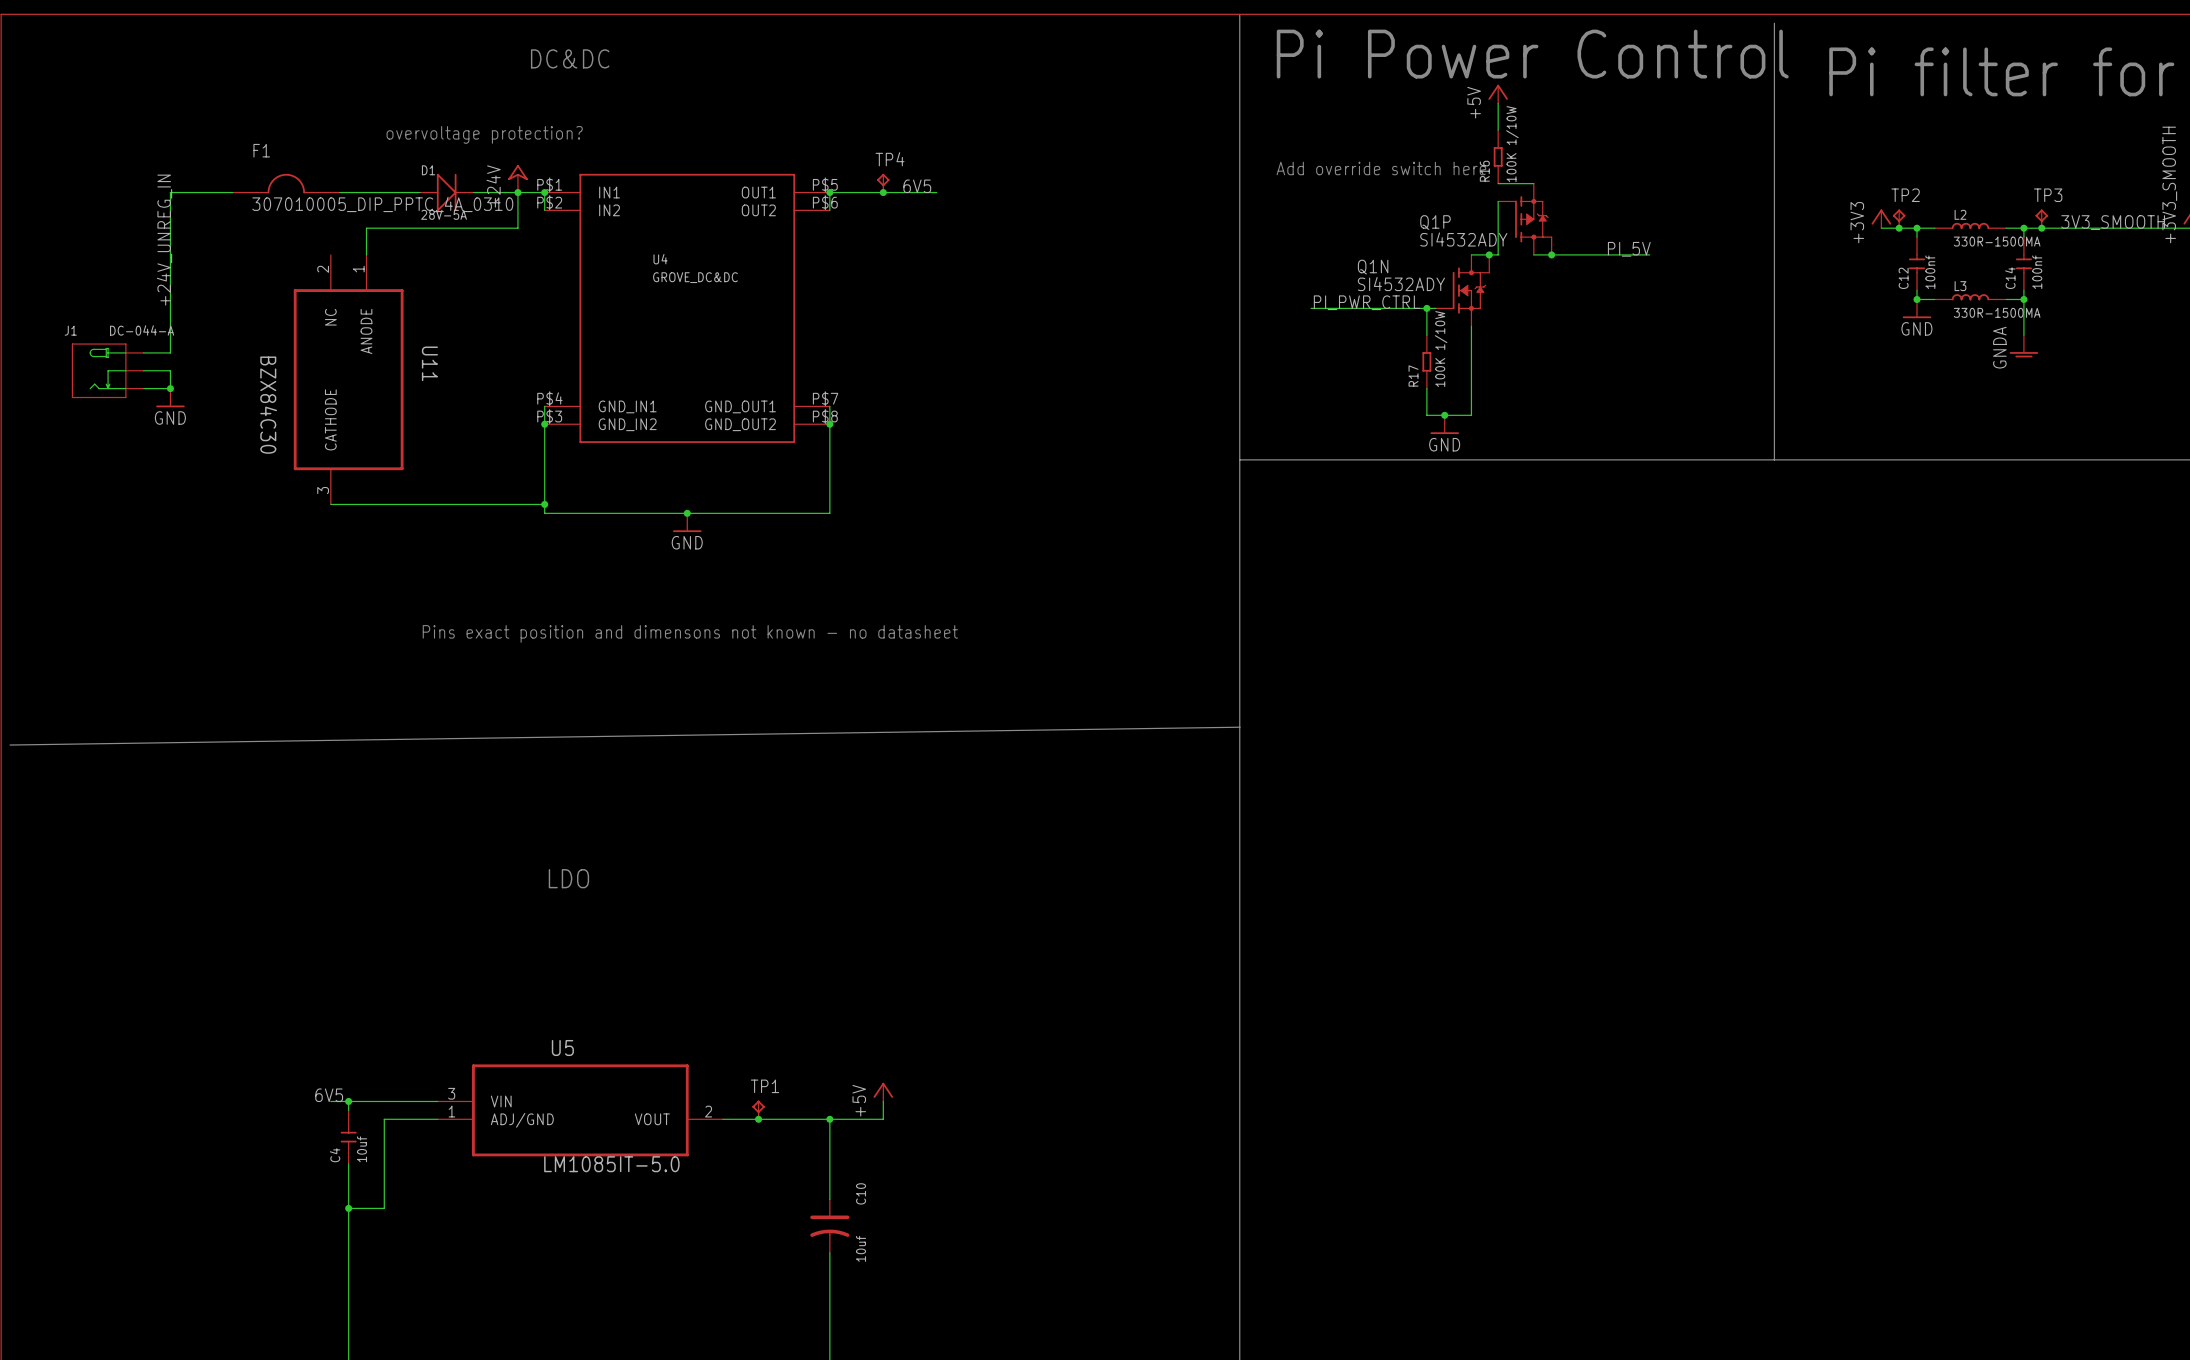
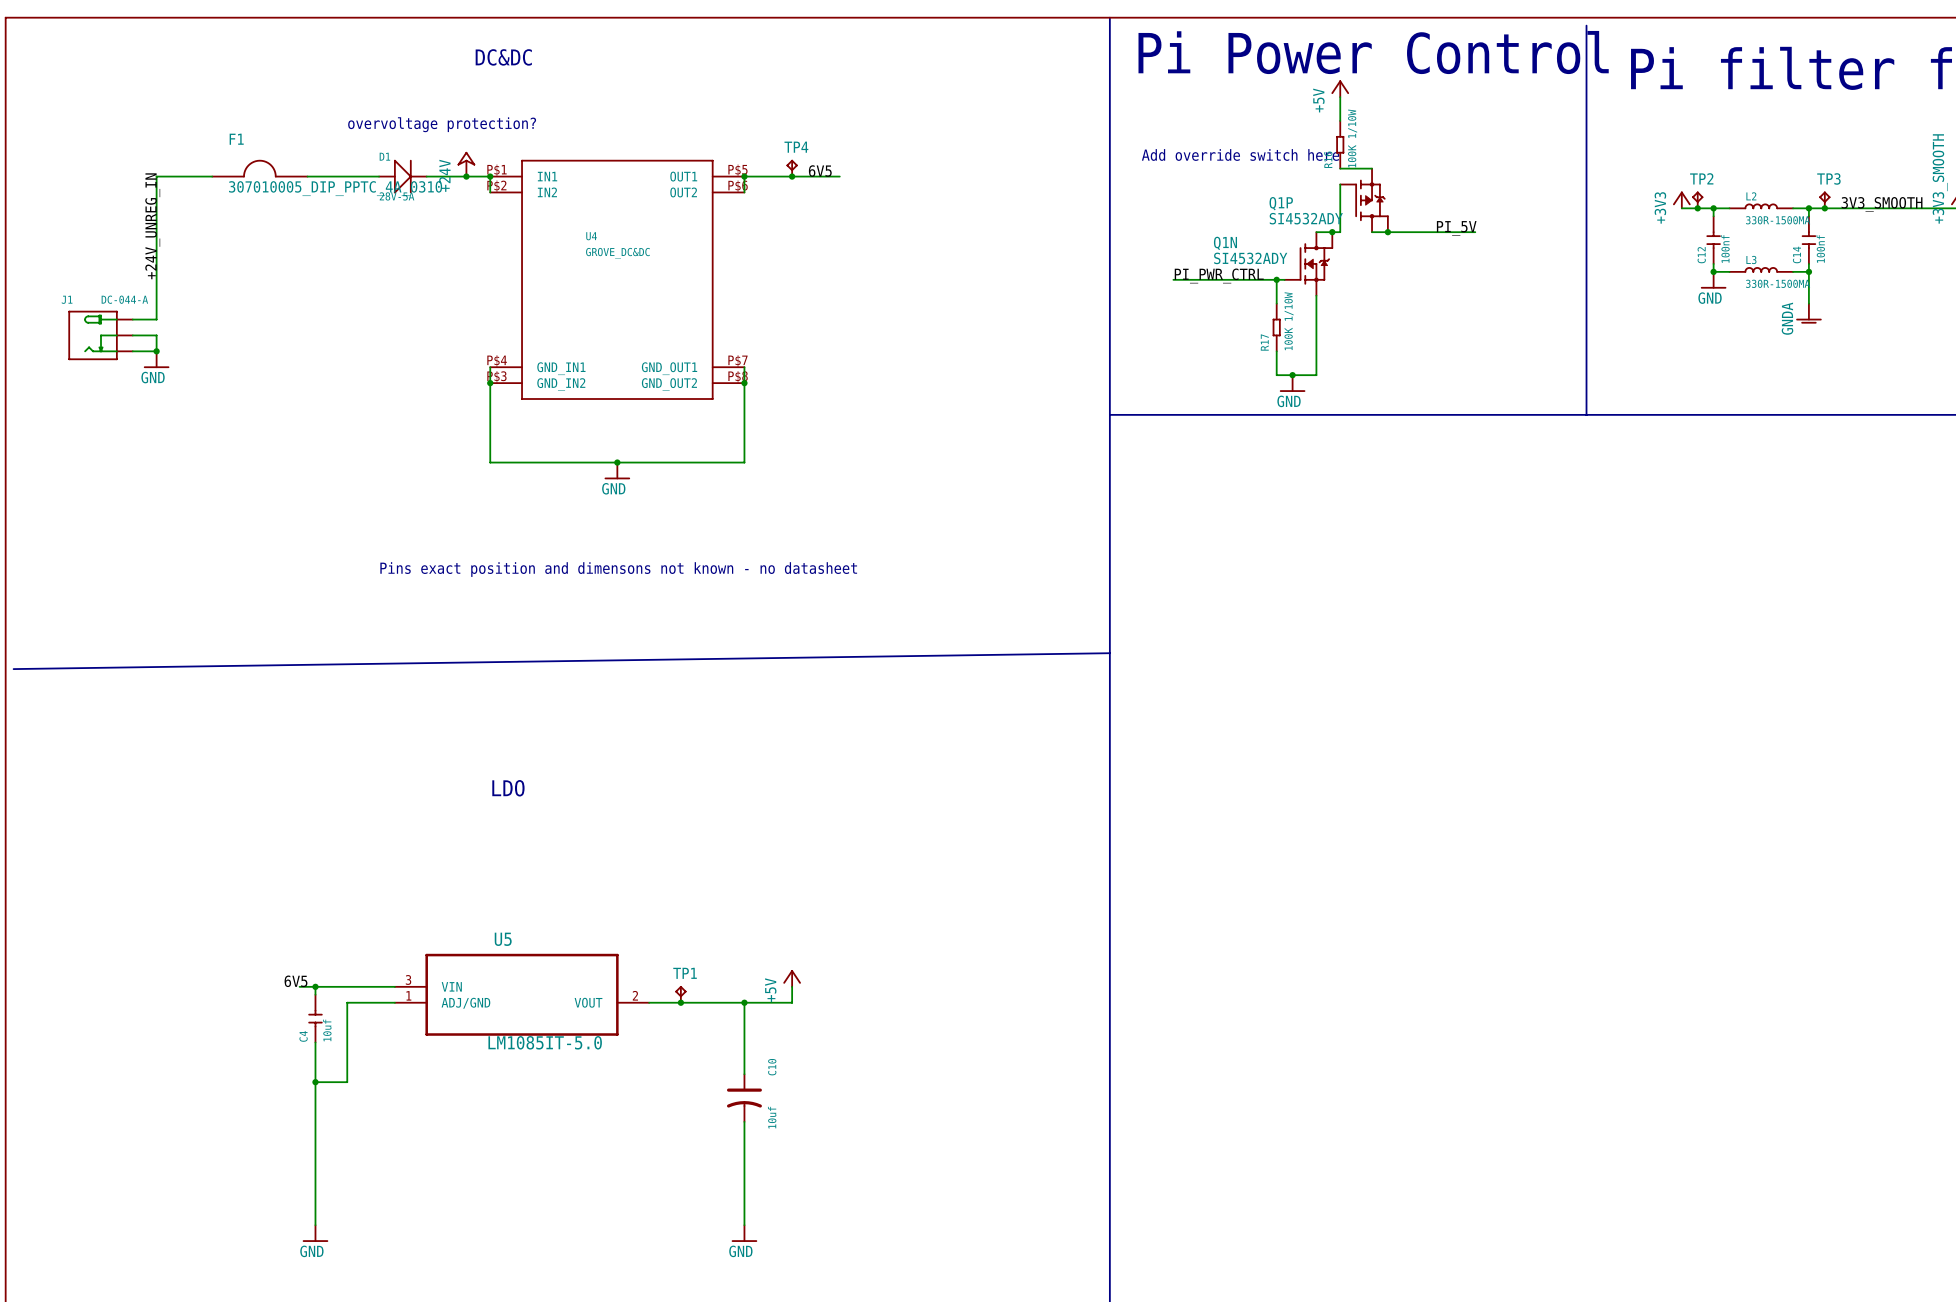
wire: (517, 192) (517, 228) (366, 228) (366, 254) -> none
U11: BZX84C30 (348, 379) -> none
wire: (330, 504) (544, 504) -> none
junction: (544, 504) -> none

